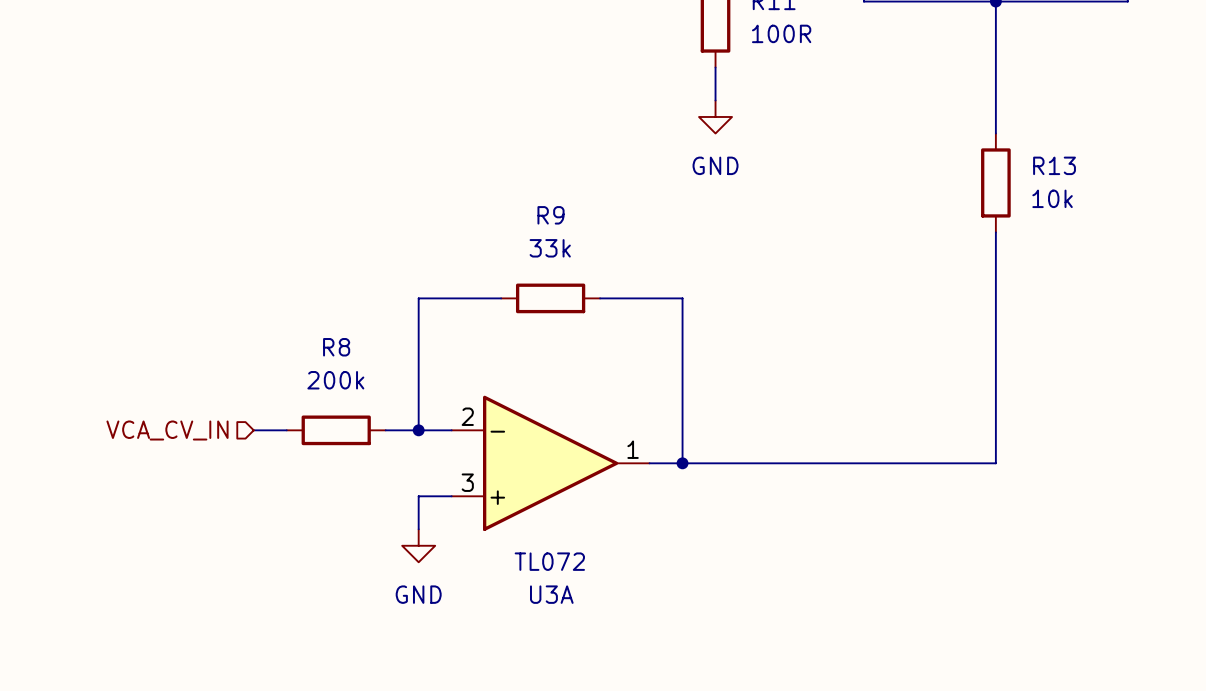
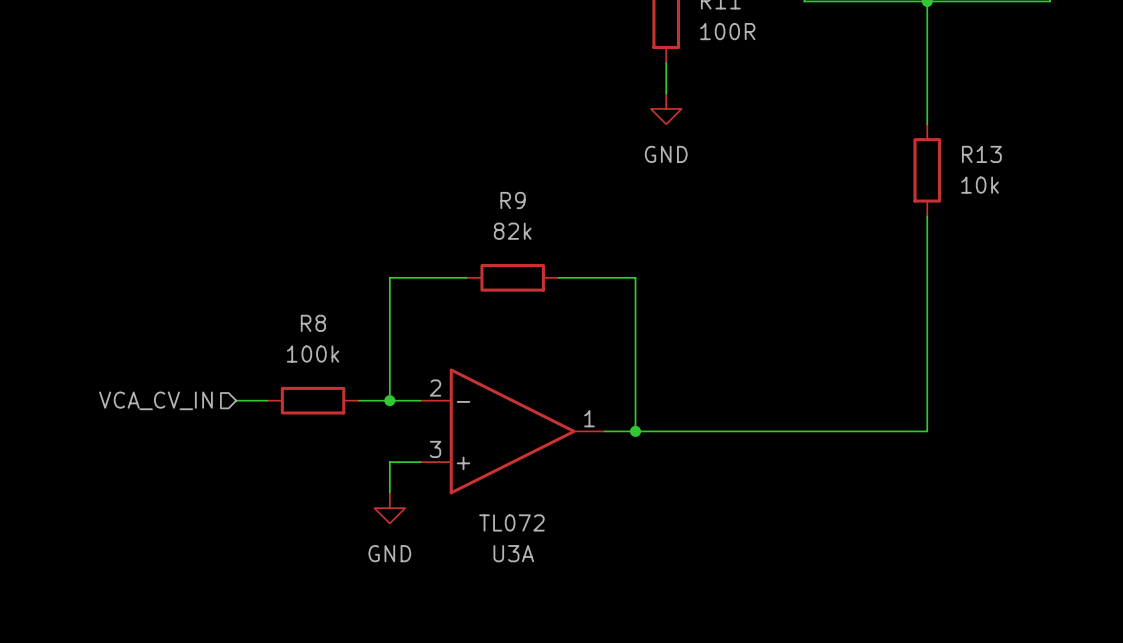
R9 value: 33k (550, 248) -> 82k (512, 231)
R8 value: 200k (335, 380) -> 100k (313, 354)

